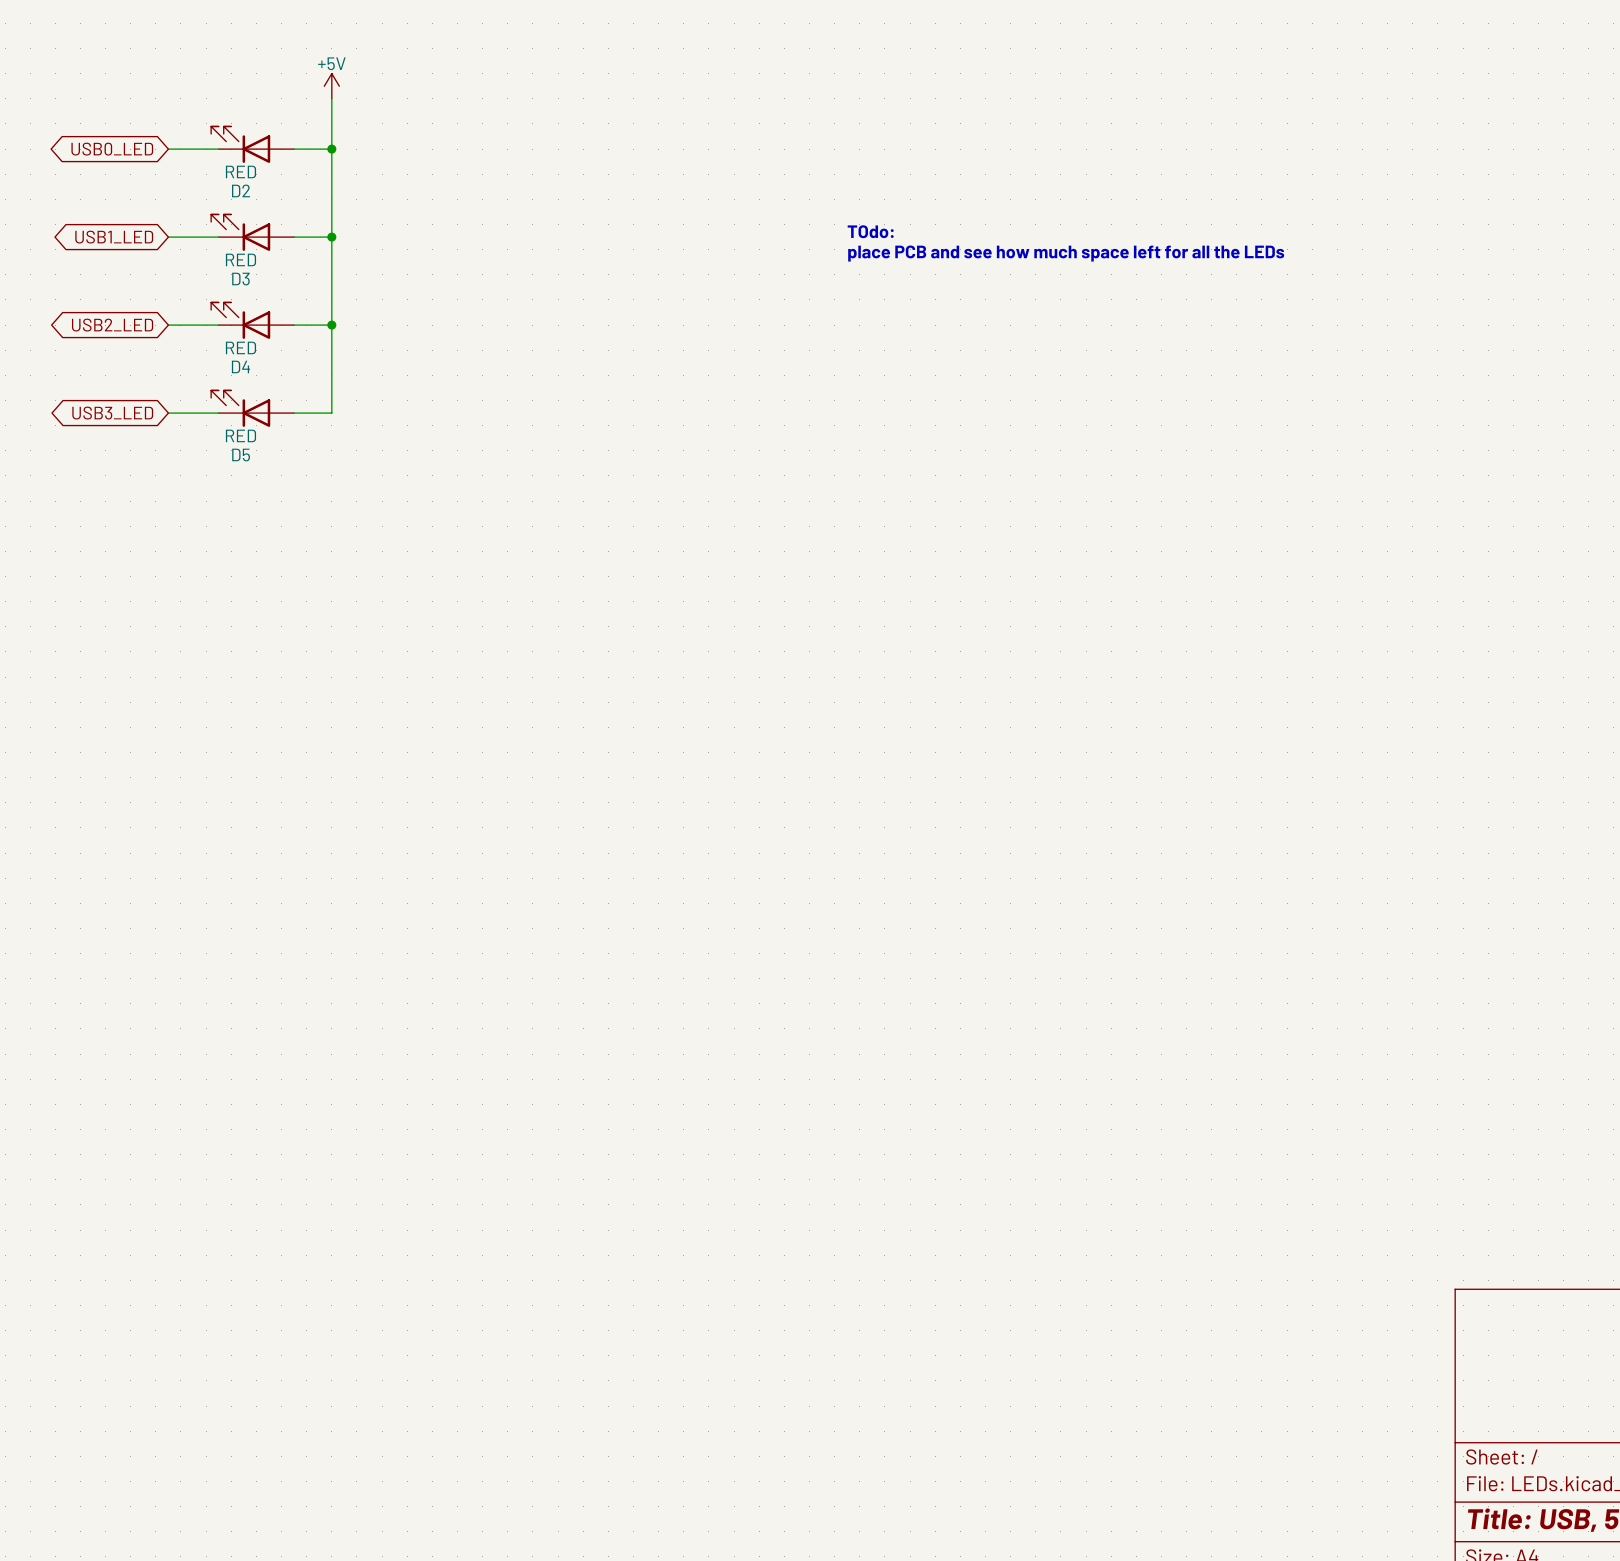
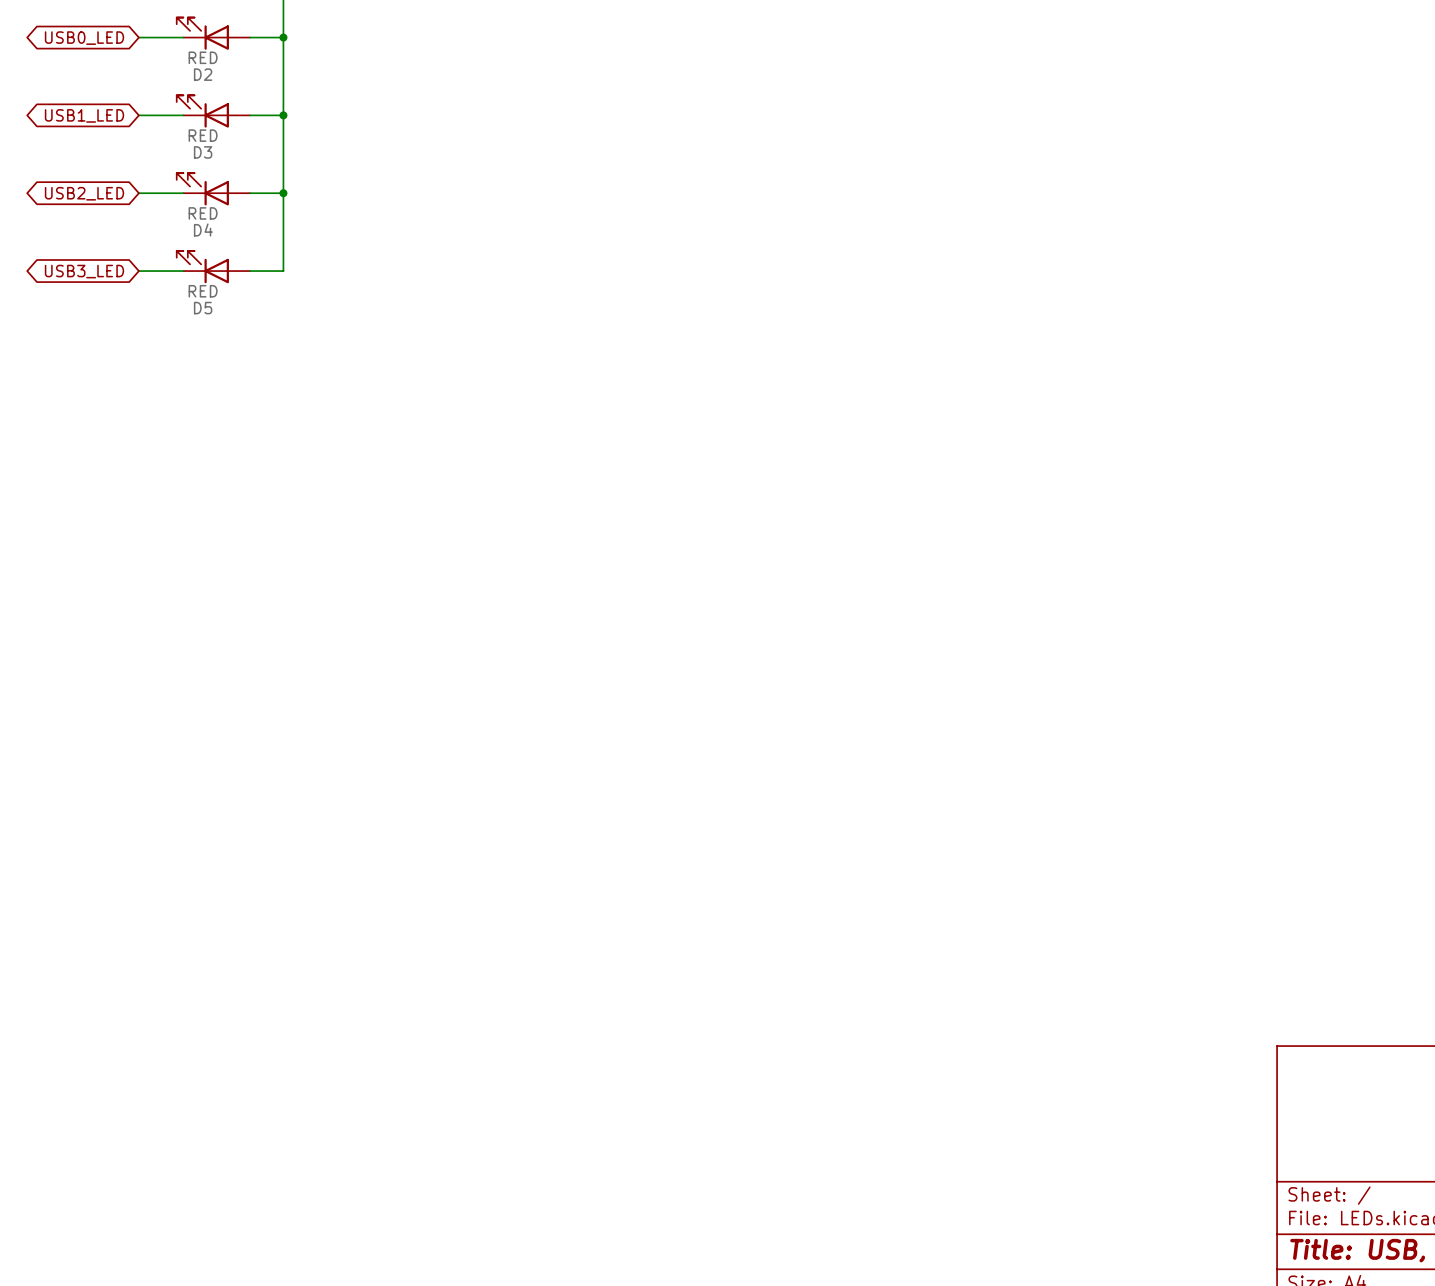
text: TOdo: (870, 231) -> none
text: place PCB and see how much space left for all the LEDs (1066, 253) -> none

